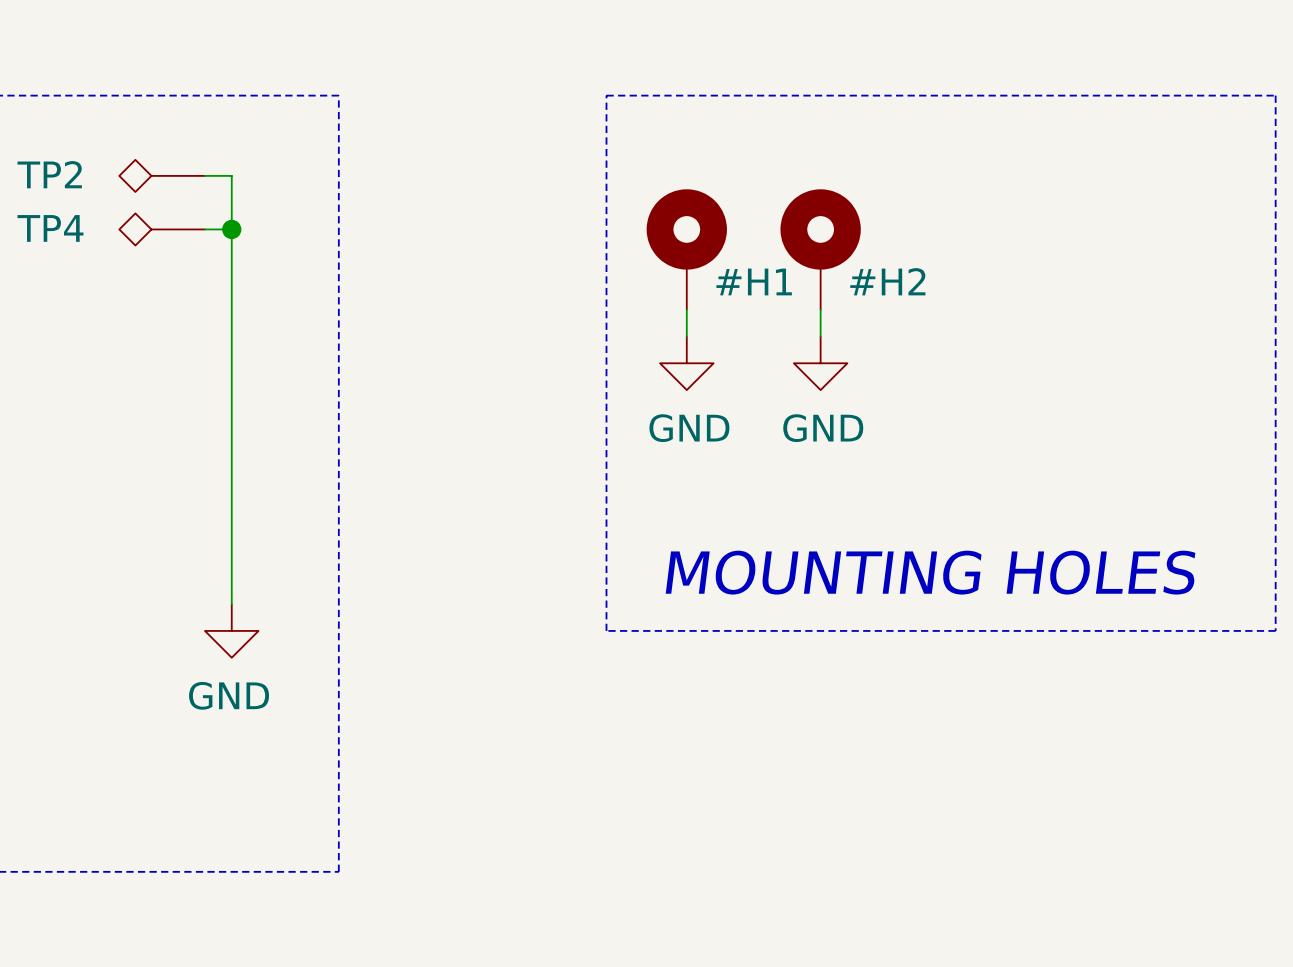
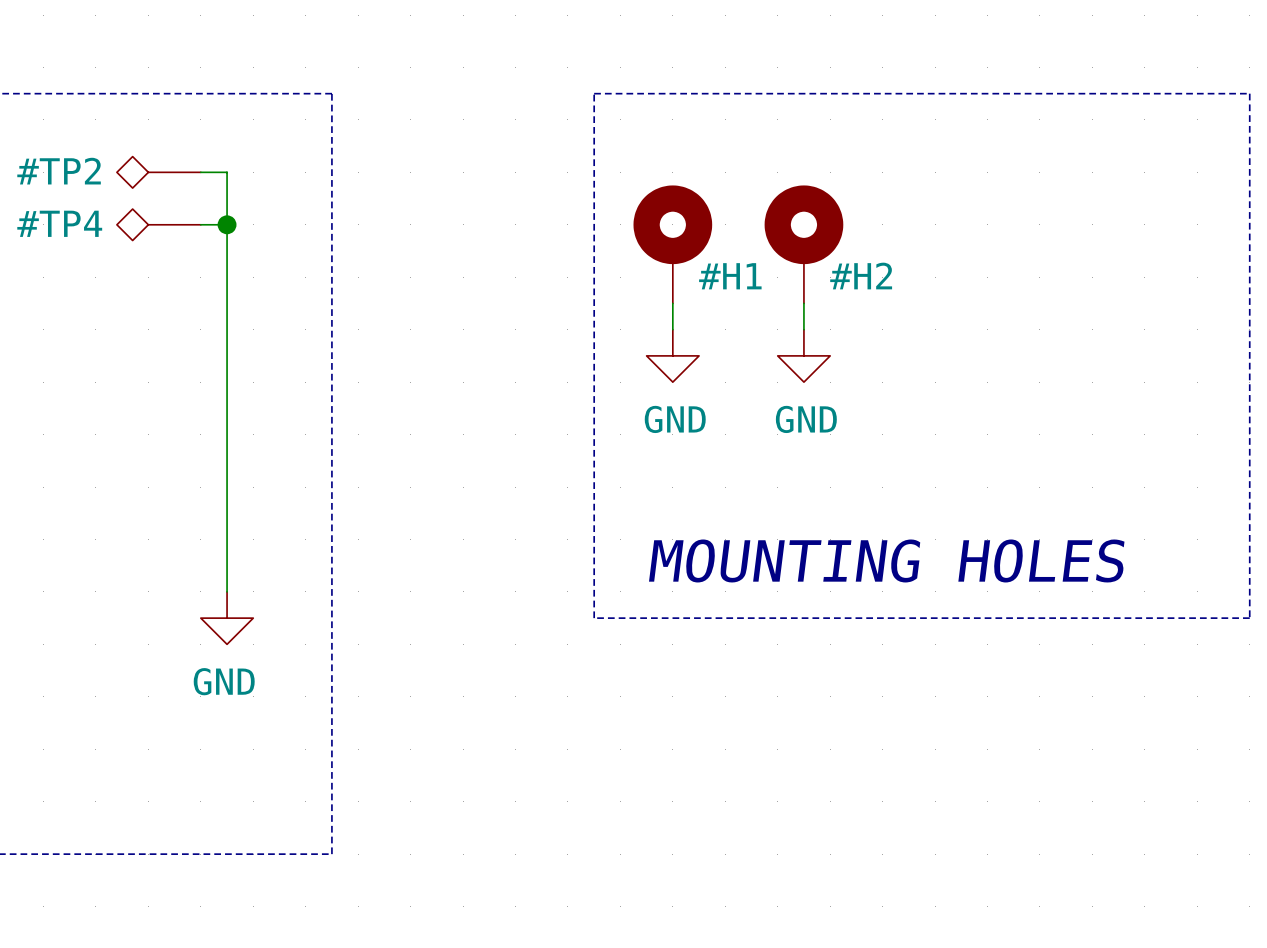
TP2: (162, 175) -> none
#TP2: none -> (158, 172)
TP4: (162, 229) -> none
#TP4: none -> (158, 224)

